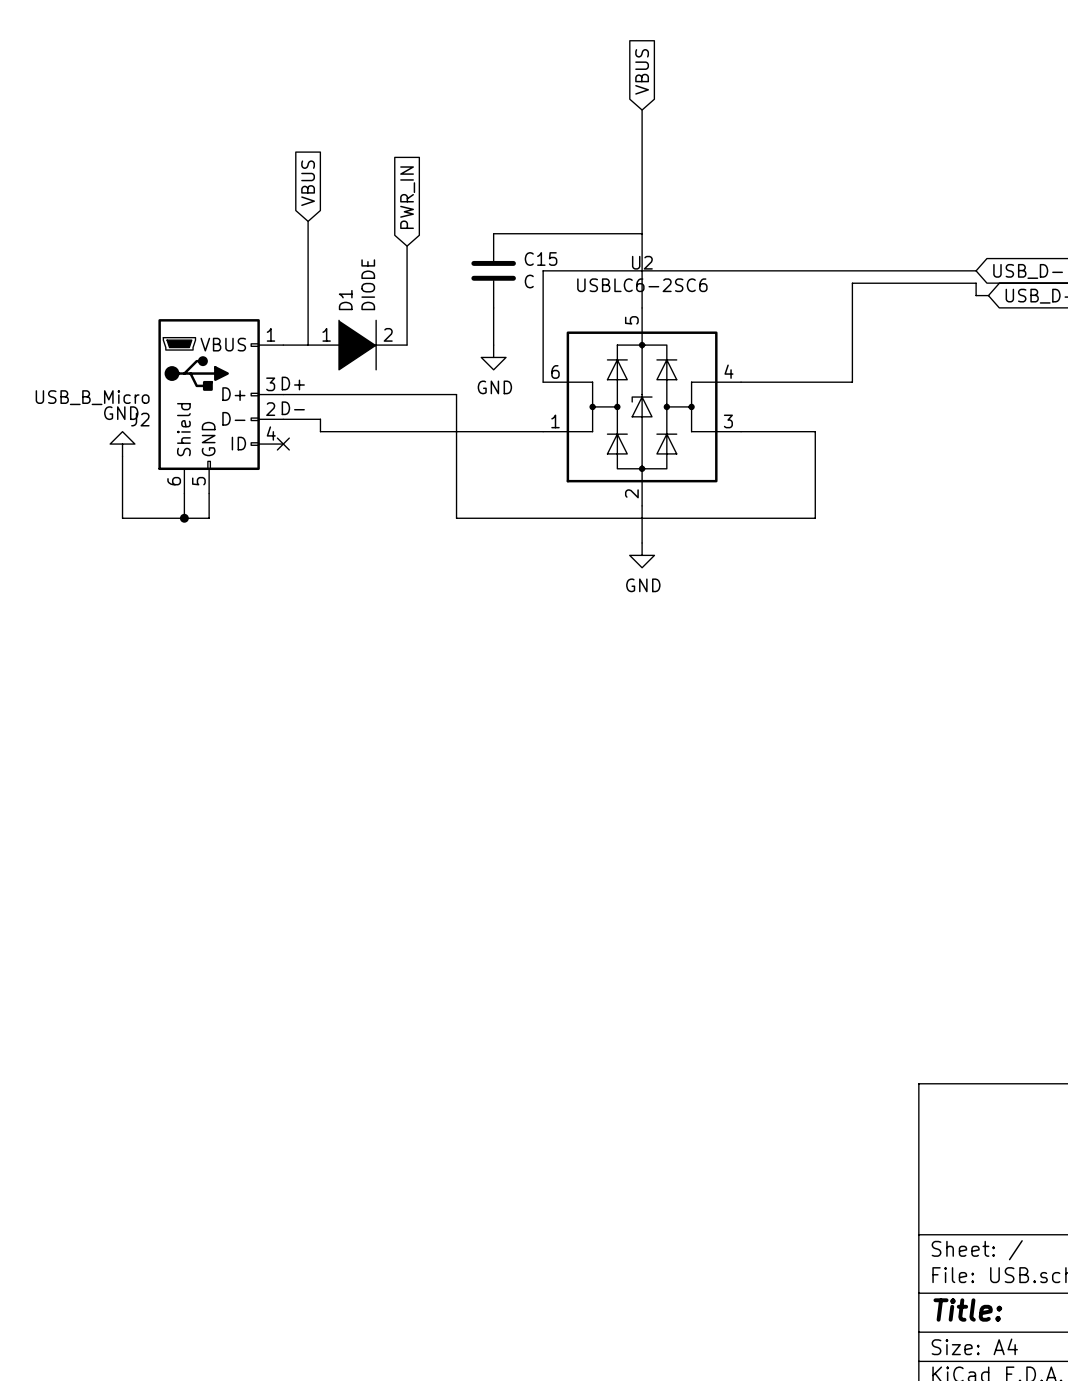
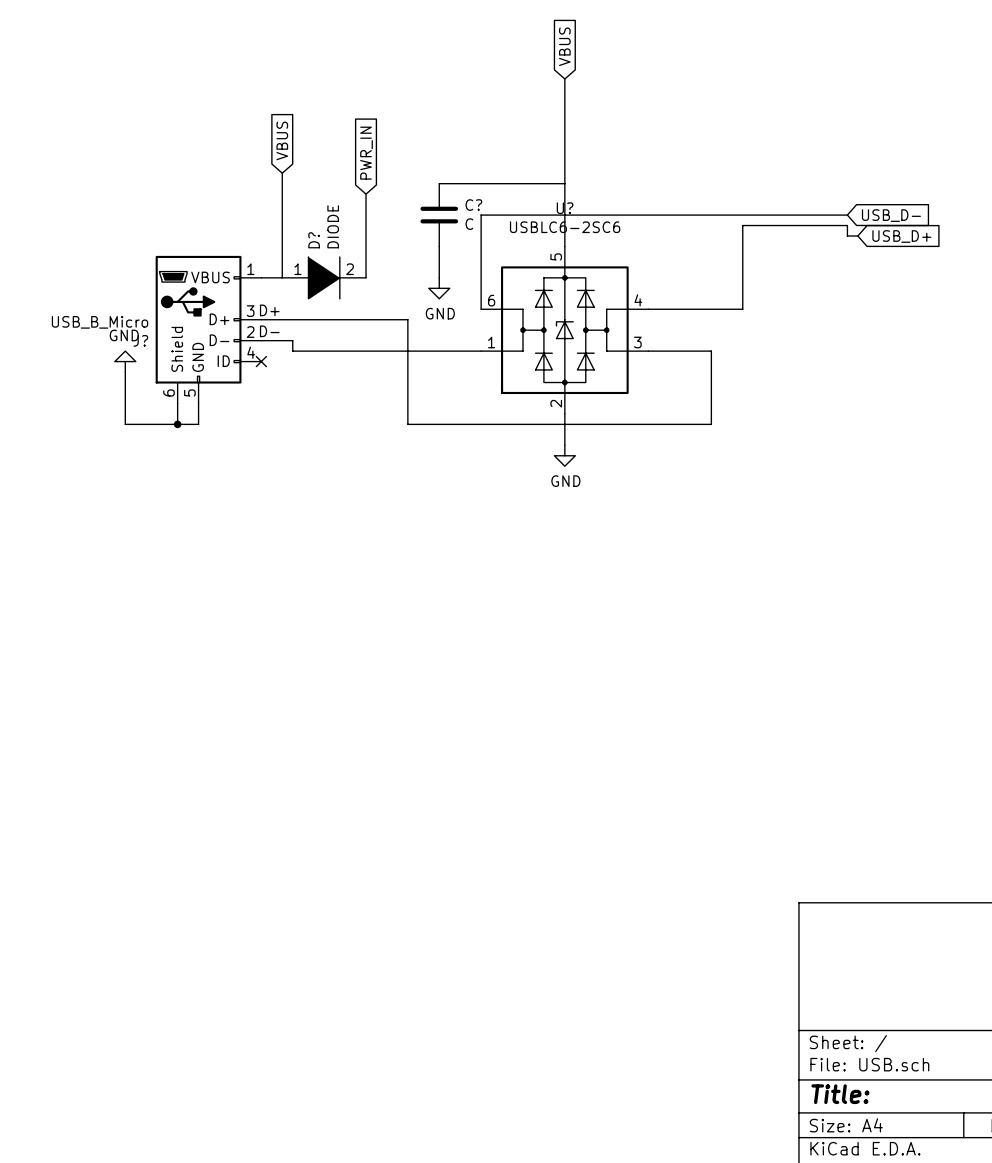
C15 name: C15 (541, 259) -> C? (473, 205)
U2 name: U2 (642, 262) -> U? (565, 208)
D1 name: D1 (345, 300) -> D? (314, 240)
J2 name: J2 (140, 419) -> J? (140, 340)

